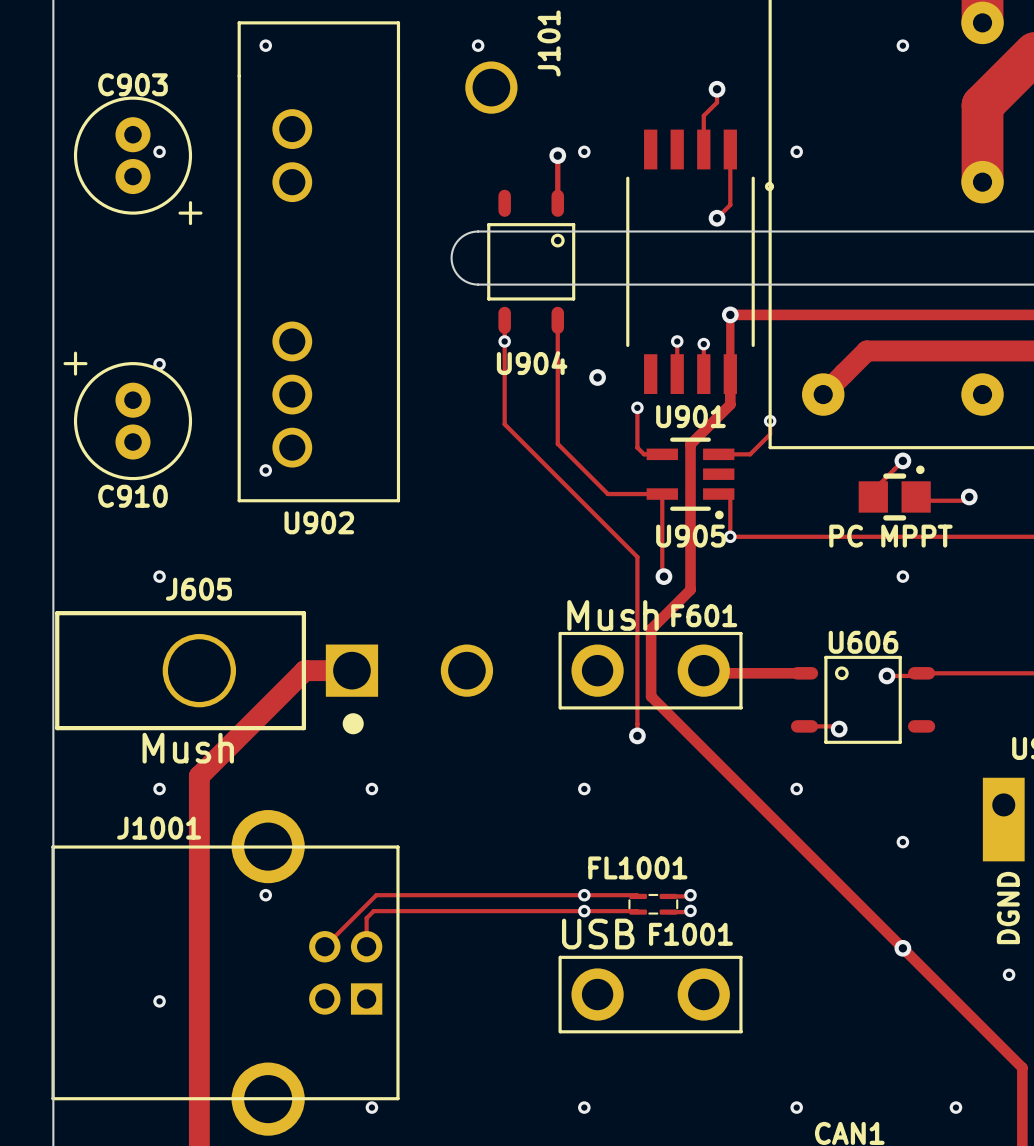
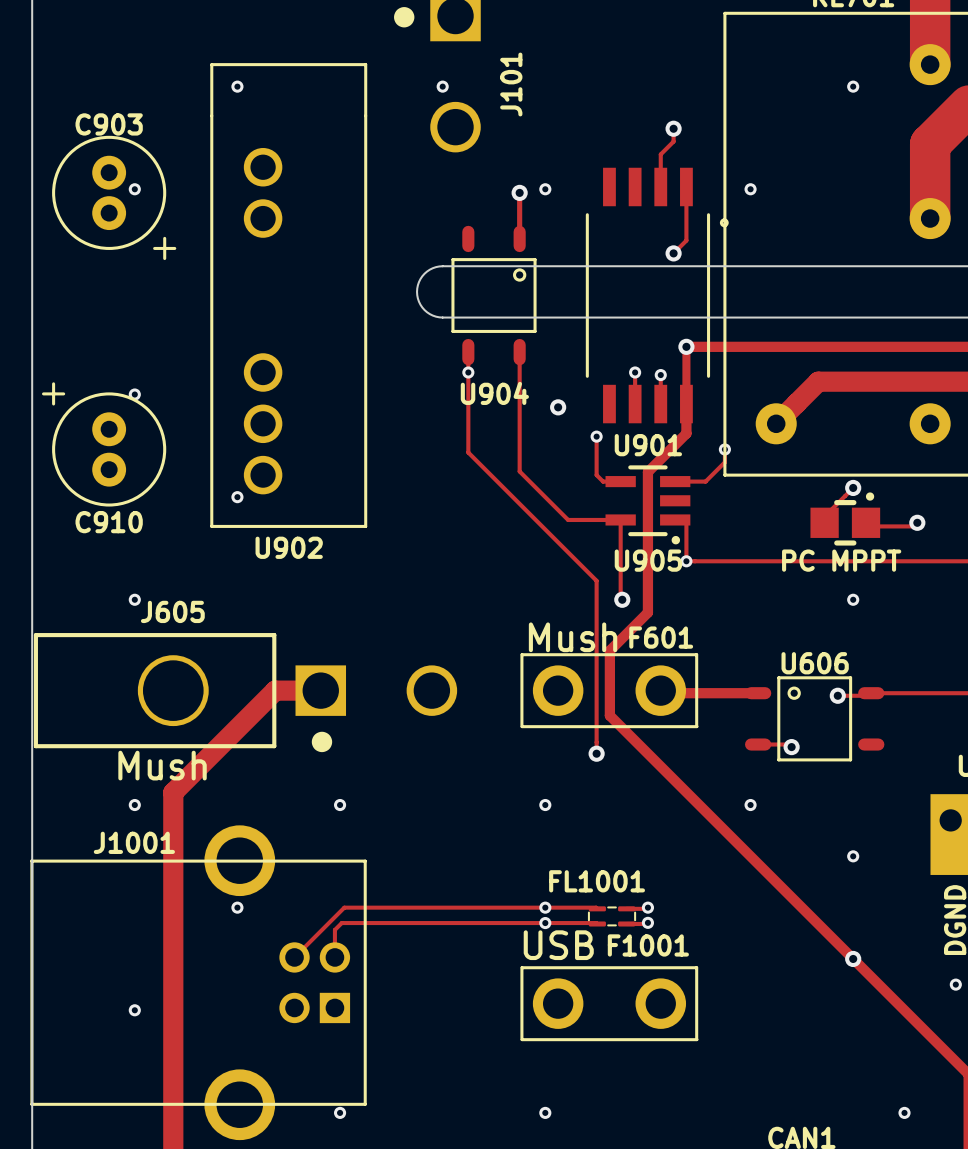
via: (796, 1107) -> none

